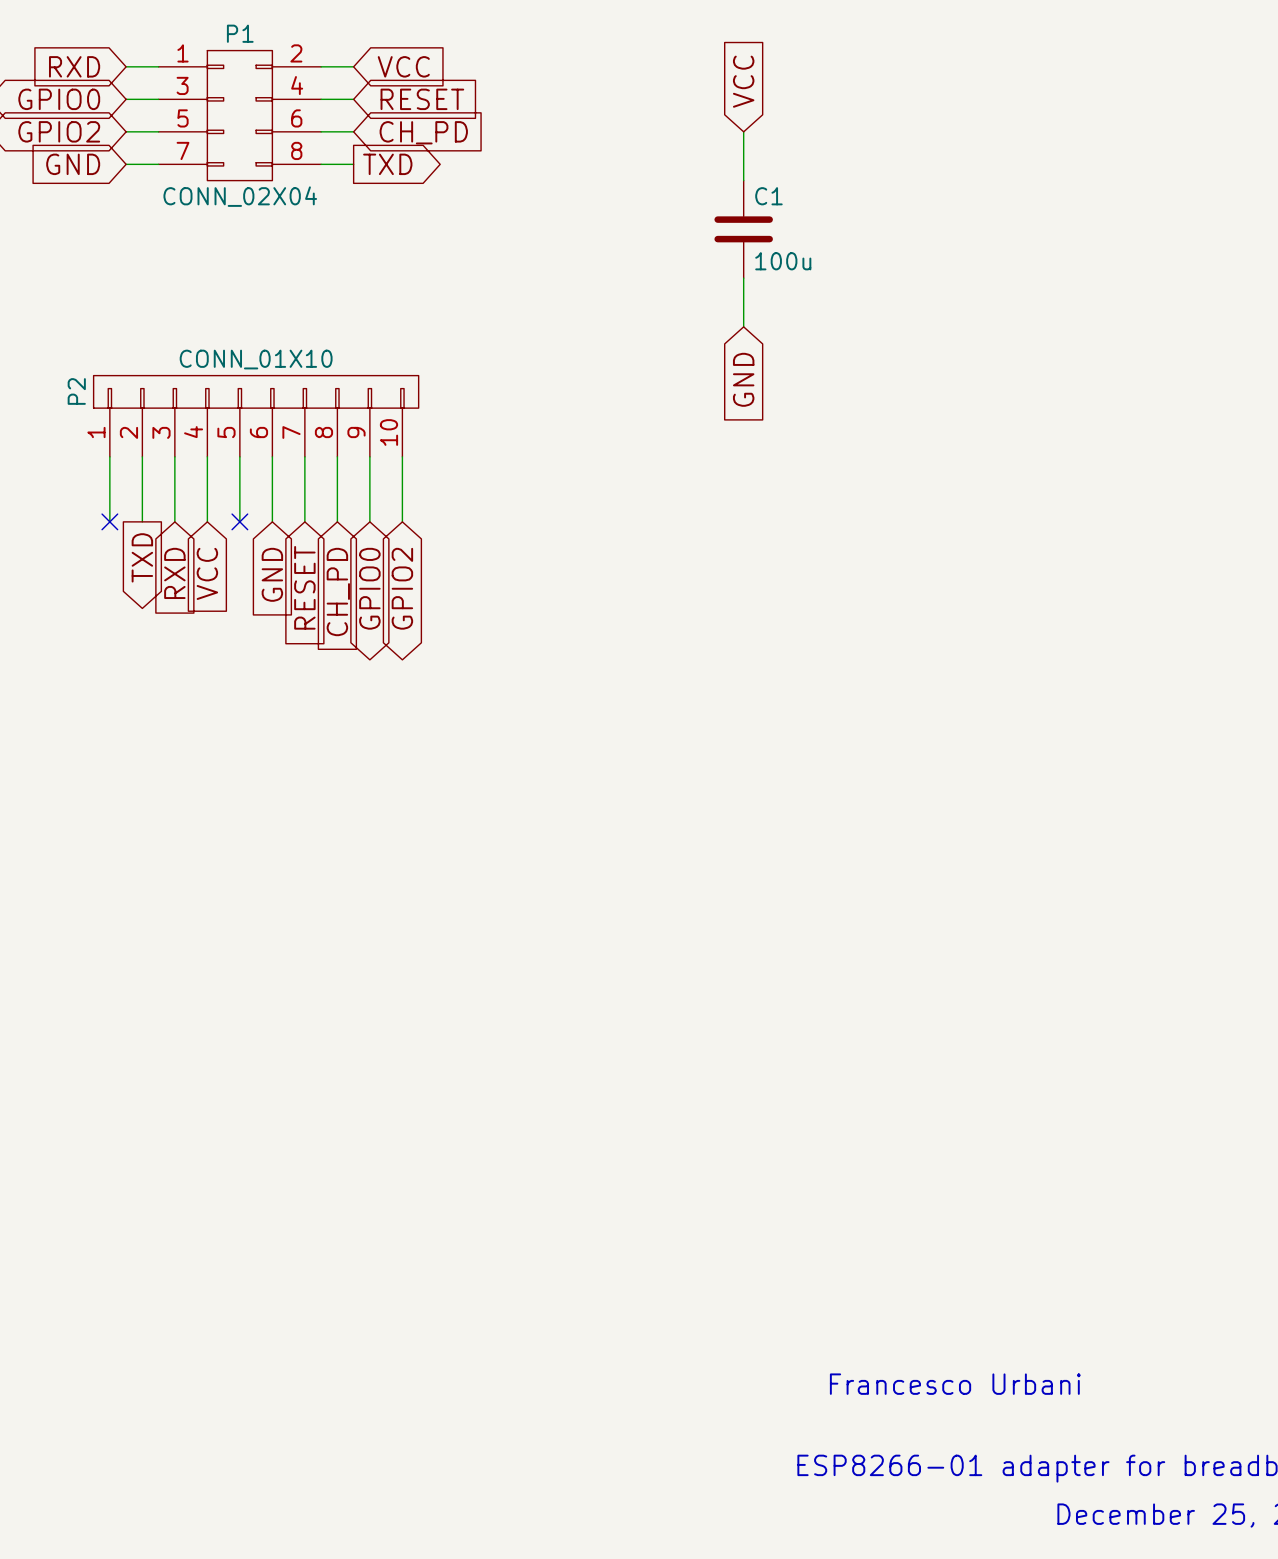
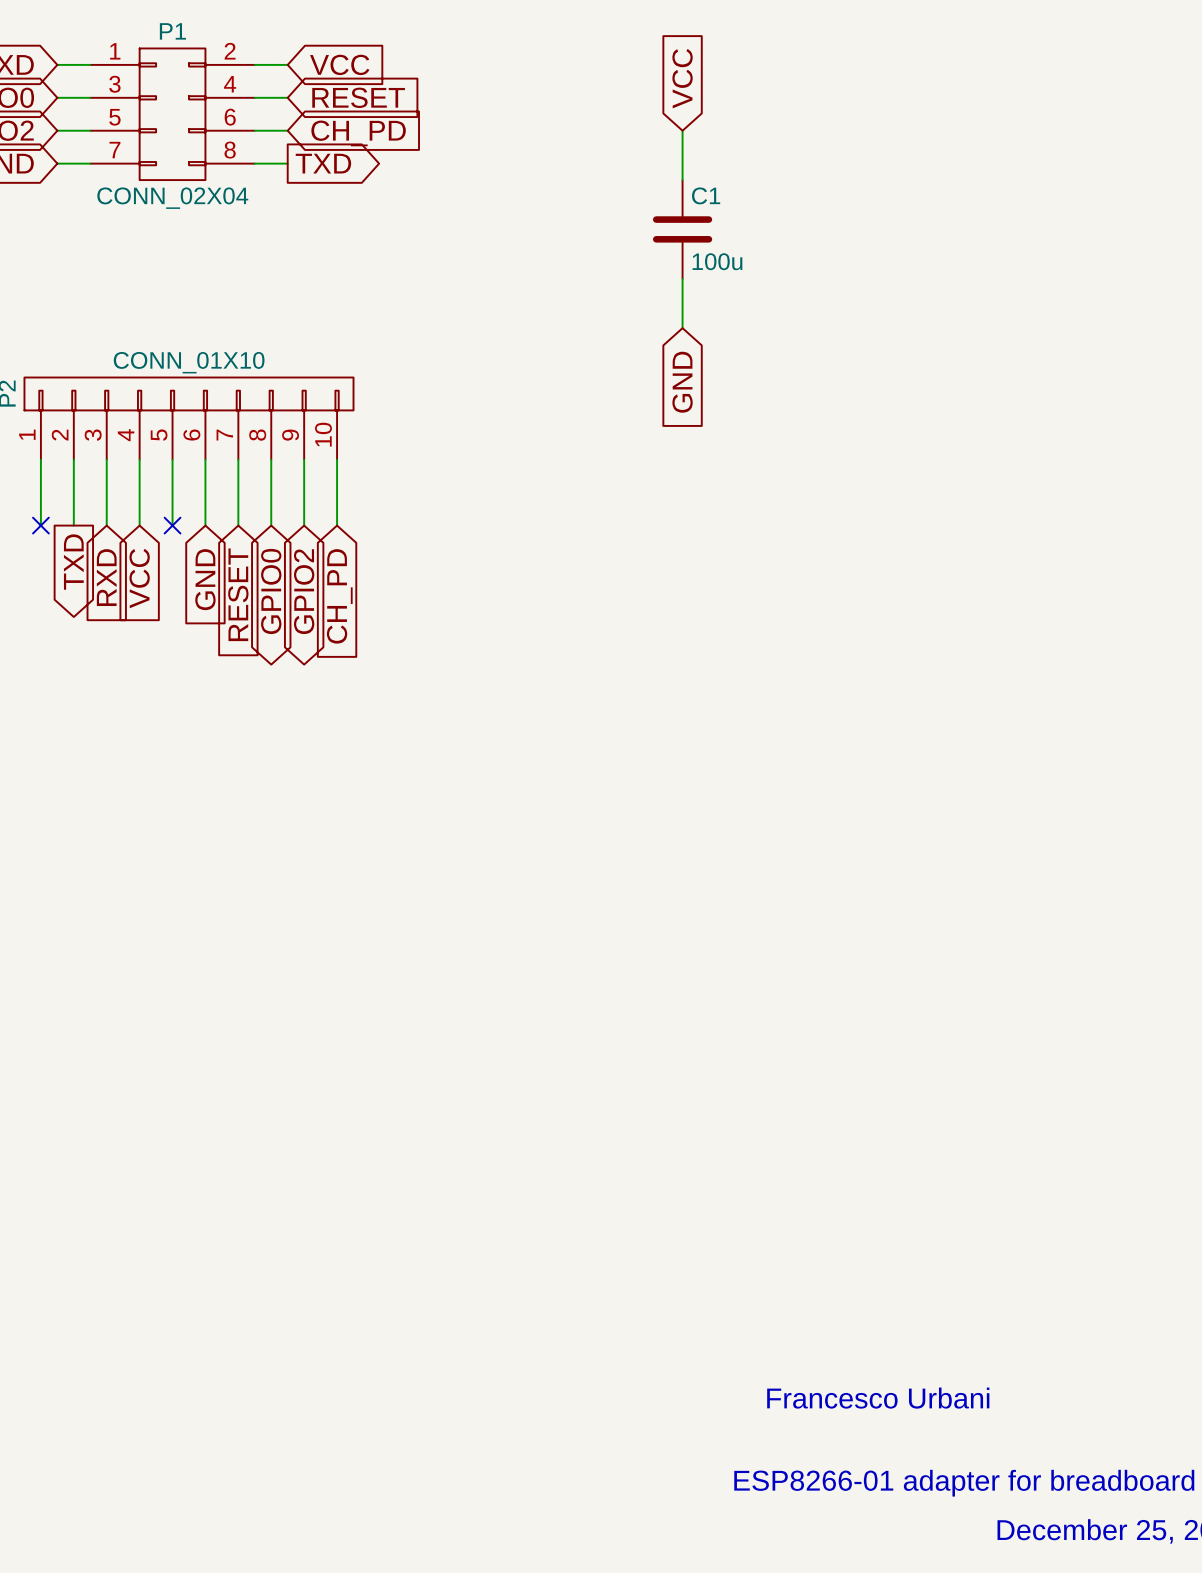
global label: GPIO0 (369, 588) -> GPIO2 (304, 591)
global label shape: bidirectional (402, 588) -> input (339, 596)
global label: GPIO2 (402, 588) -> CH_PD (339, 596)
global label shape: input (338, 592) -> bidirectional (271, 591)
global label: CH_PD (338, 592) -> GPIO0 (271, 591)

